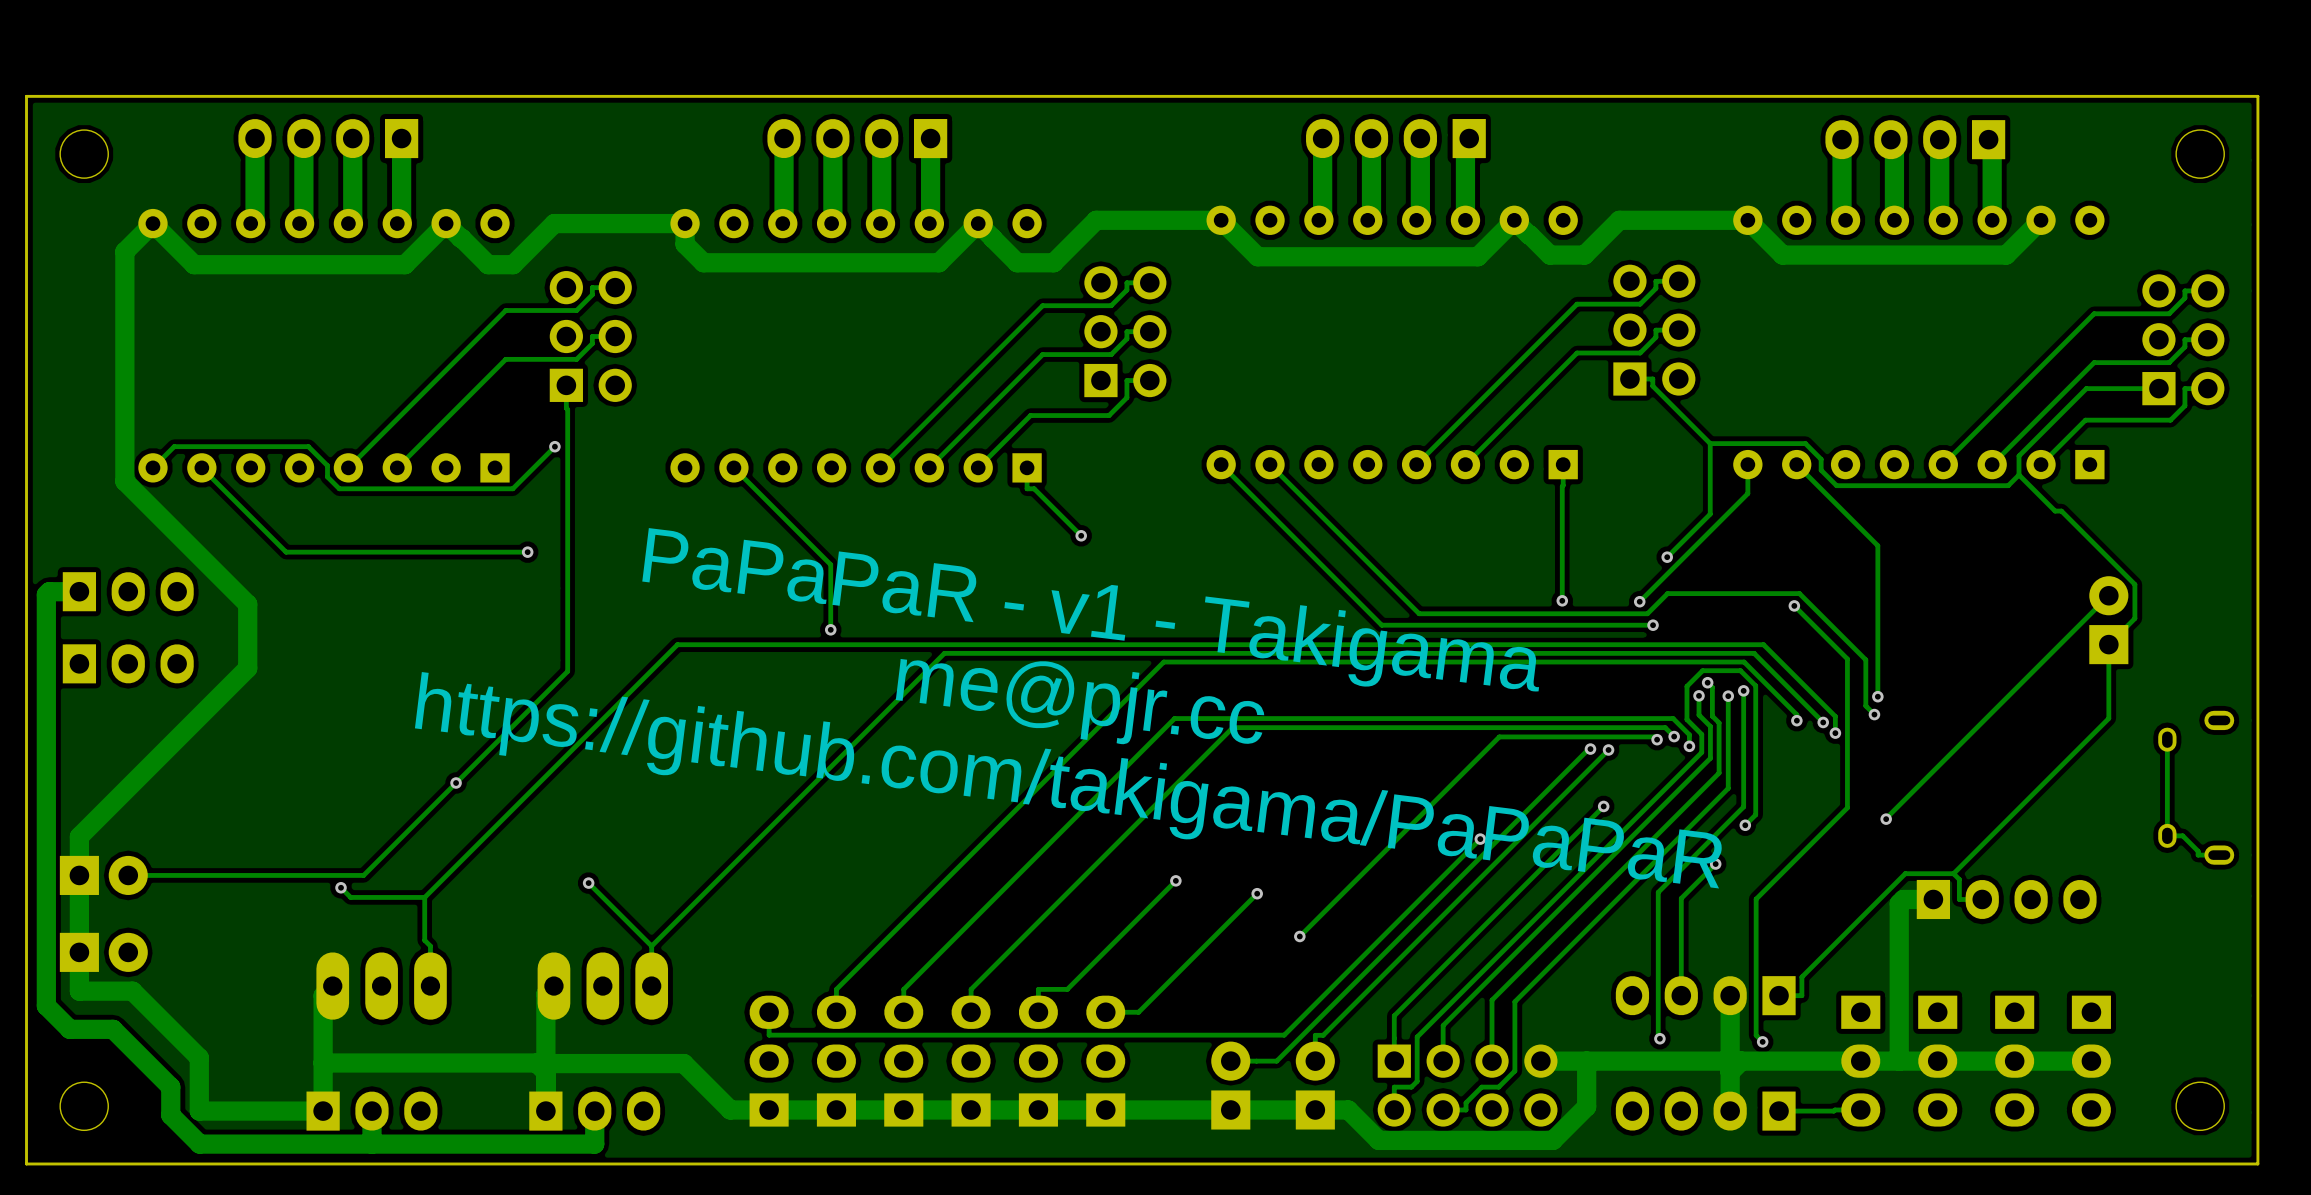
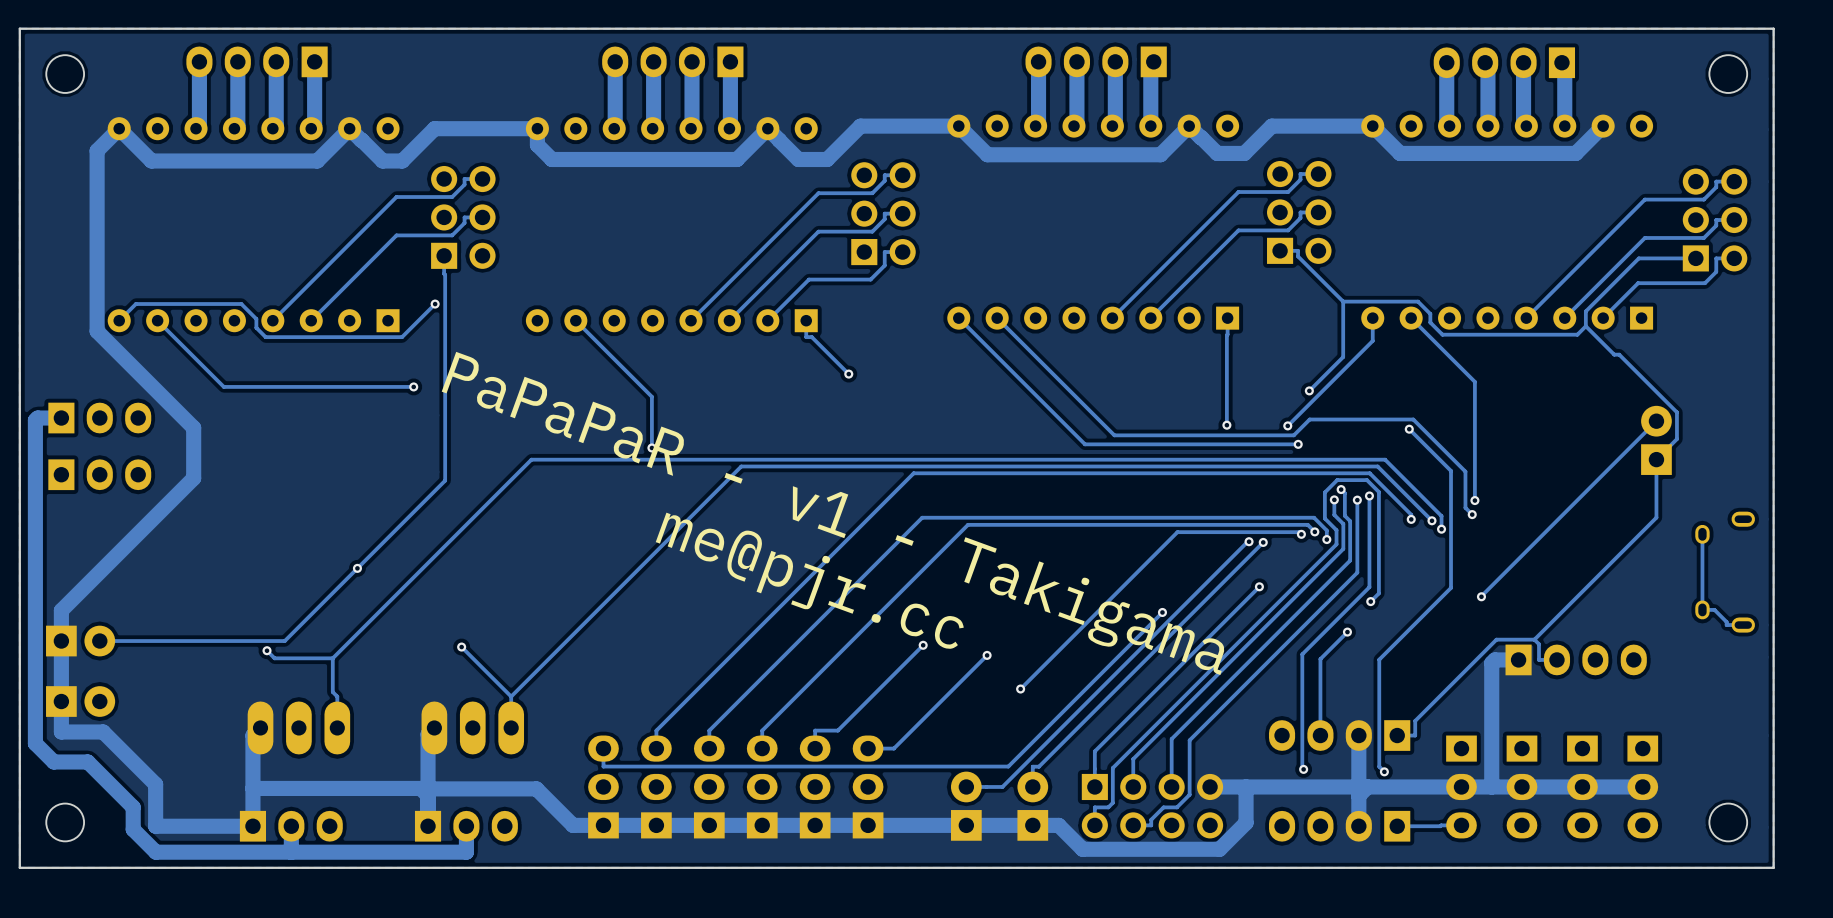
text rotation: 0° (1090, 609) -> 13° clockwise (833, 513)
text rotation: 0° (1080, 701) -> 13° clockwise (809, 581)
text: https://github.com/takigama/PaPaPaR (1068, 780) -> none

